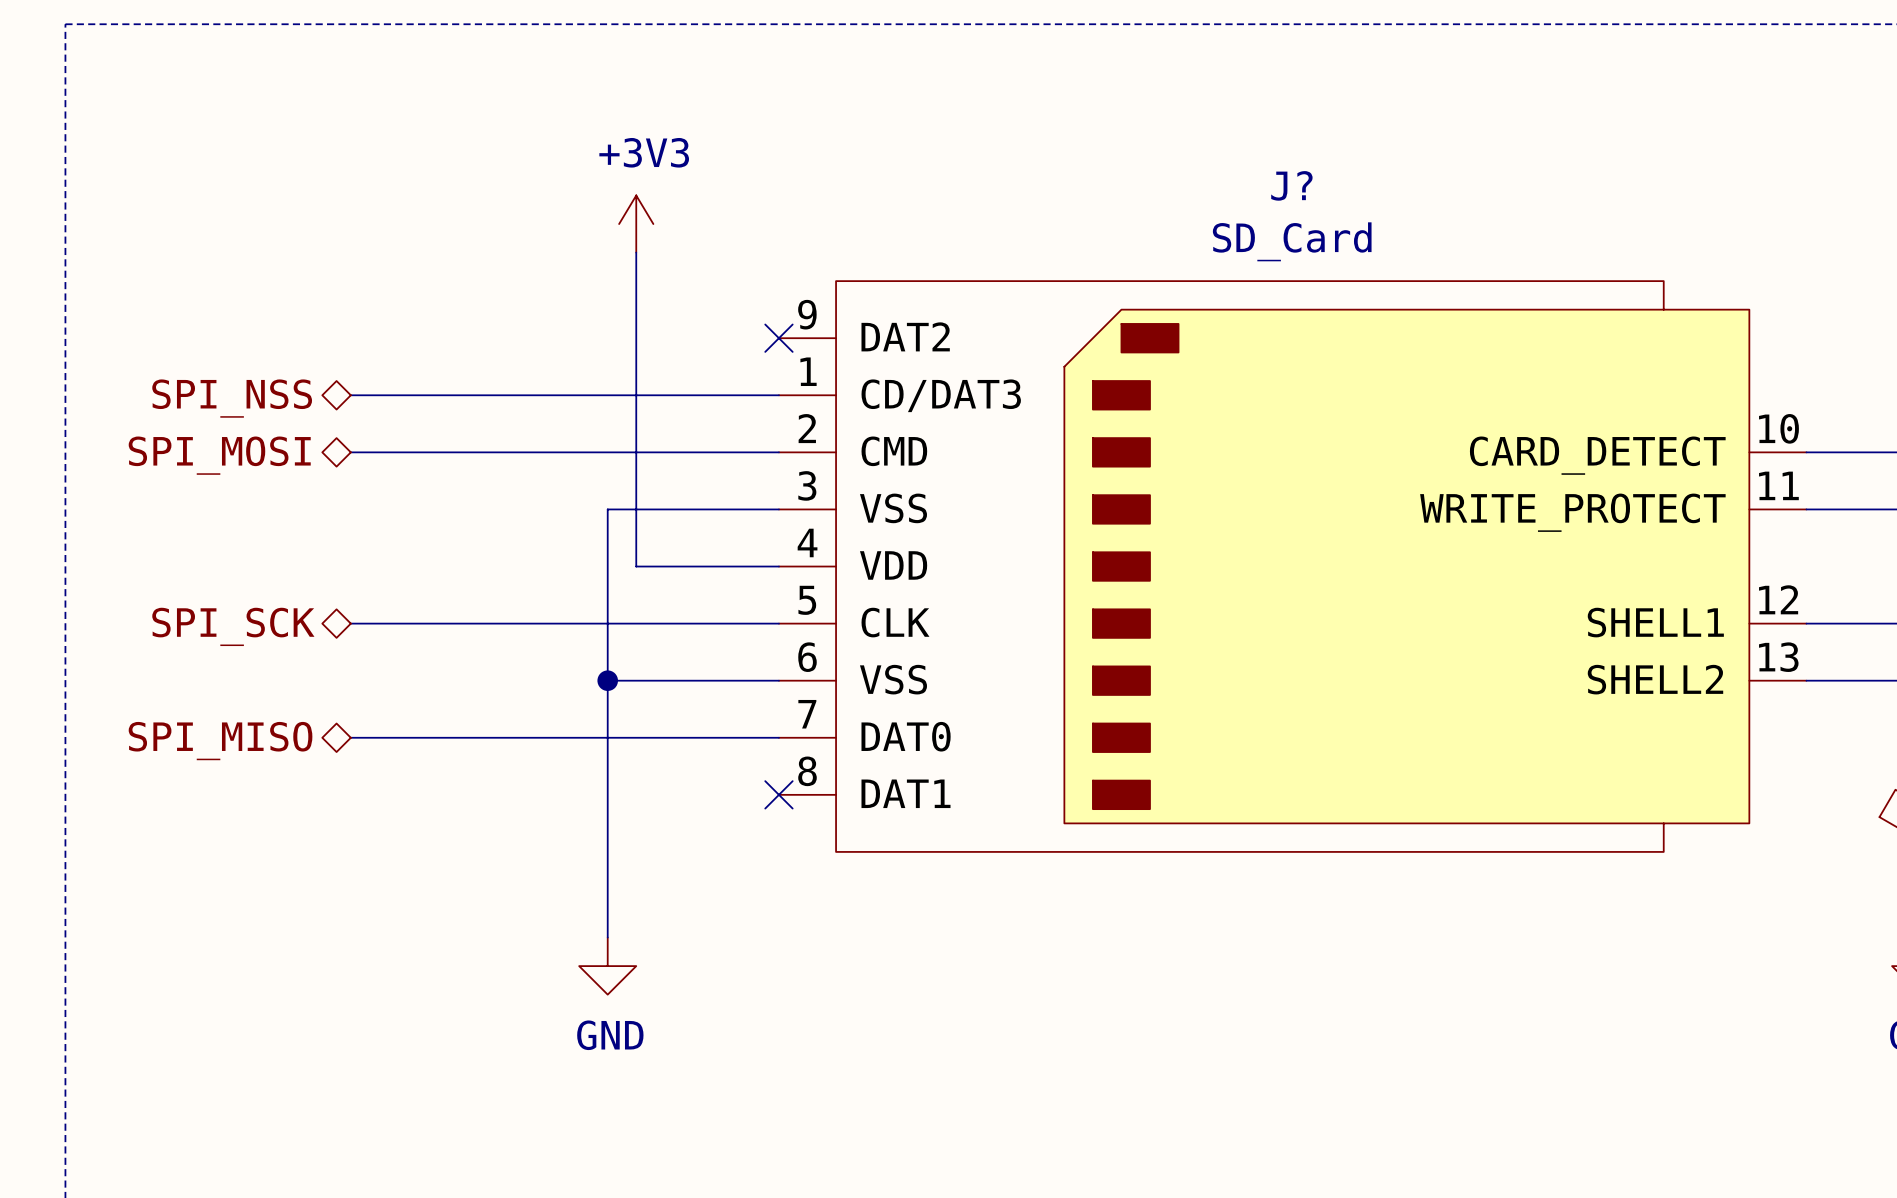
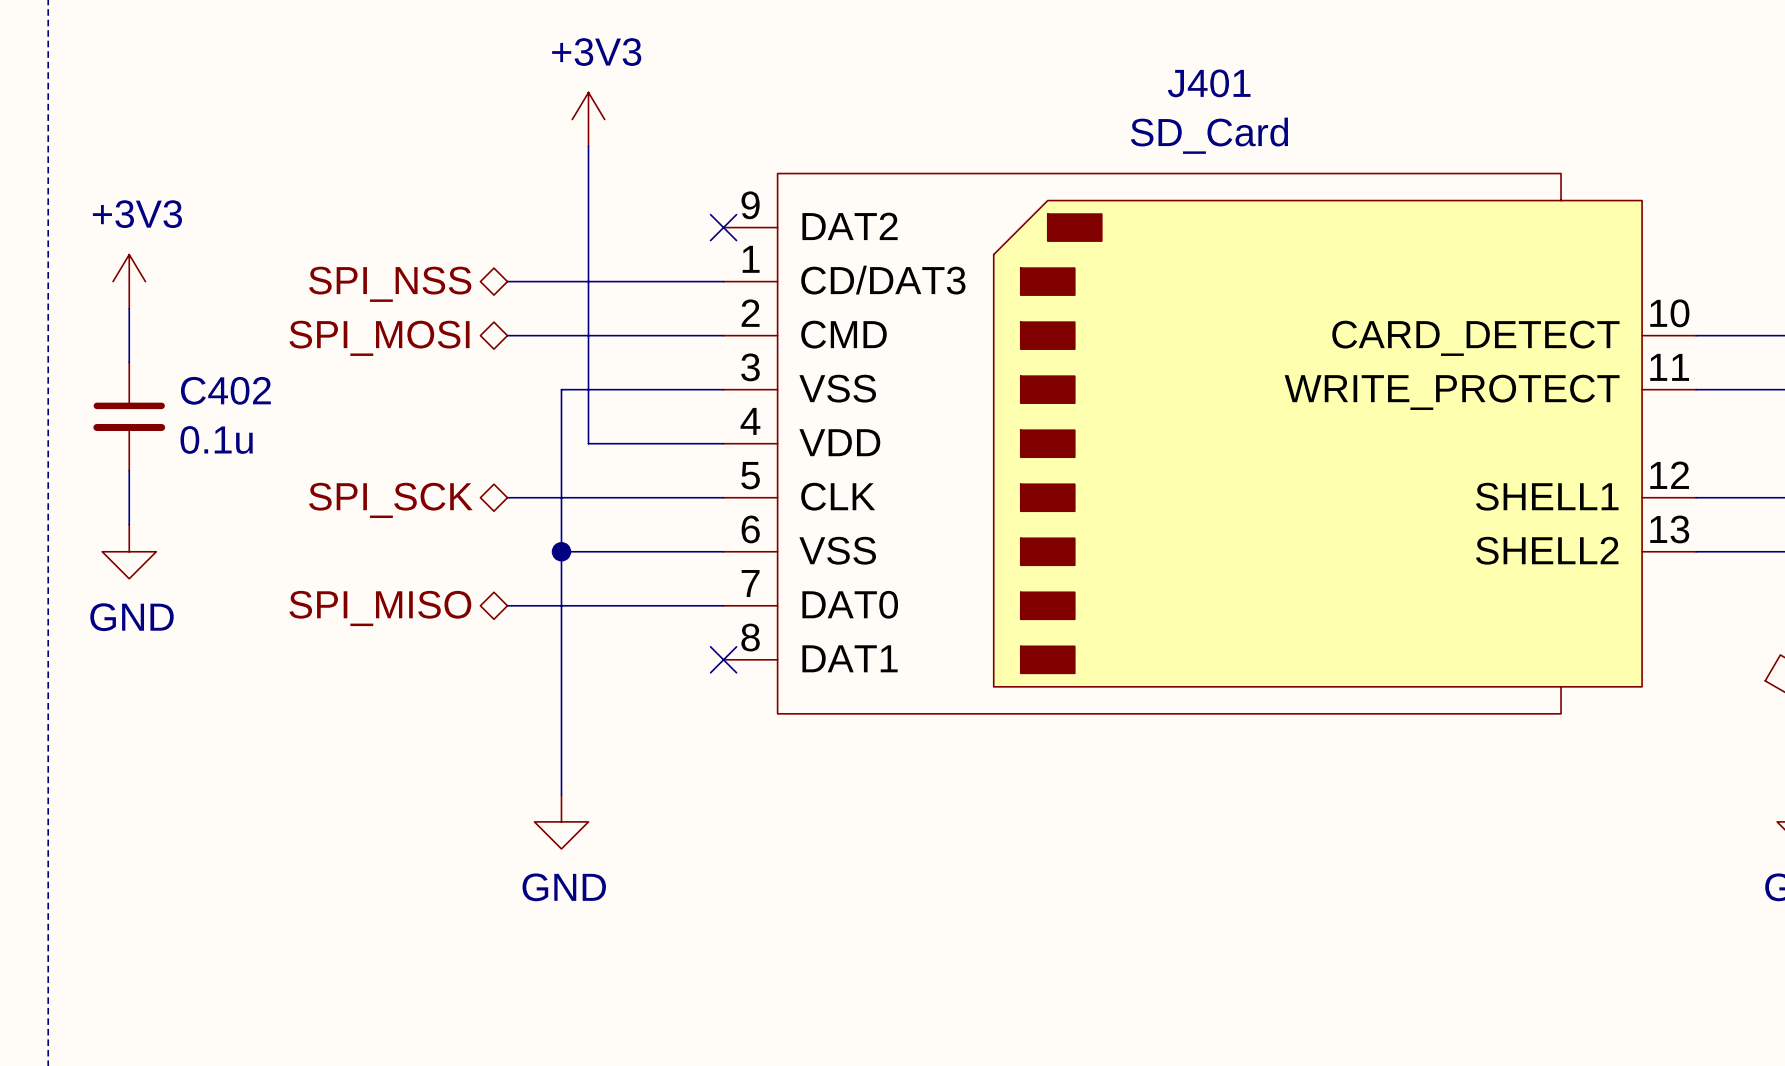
J? name: J? (1291, 185) -> J401 (1209, 83)
power symbol: none -> +3V3 (129, 281)
wire: (350, 395) (550, 395) -> none
hierarchical label position: SPI_NSS (232, 398) -> SPI_NSS (390, 284)
wire: none -> (129, 308) (129, 362)
wire: (350, 452) (550, 452) -> none
hierarchical label position: SPI_MOSI (219, 455) -> SPI_MOSI (379, 338)
C402: none -> 0.1u (129, 416)
wire: none -> (129, 470) (129, 524)
wire: (350, 623) (550, 623) -> none
hierarchical label position: SPI_SCK (233, 626) -> SPI_SCK (390, 500)
power symbol: none -> GND (129, 551)
wire: (350, 737) (550, 737) -> none
hierarchical label position: SPI_MISO (220, 741) -> SPI_MISO (380, 608)

